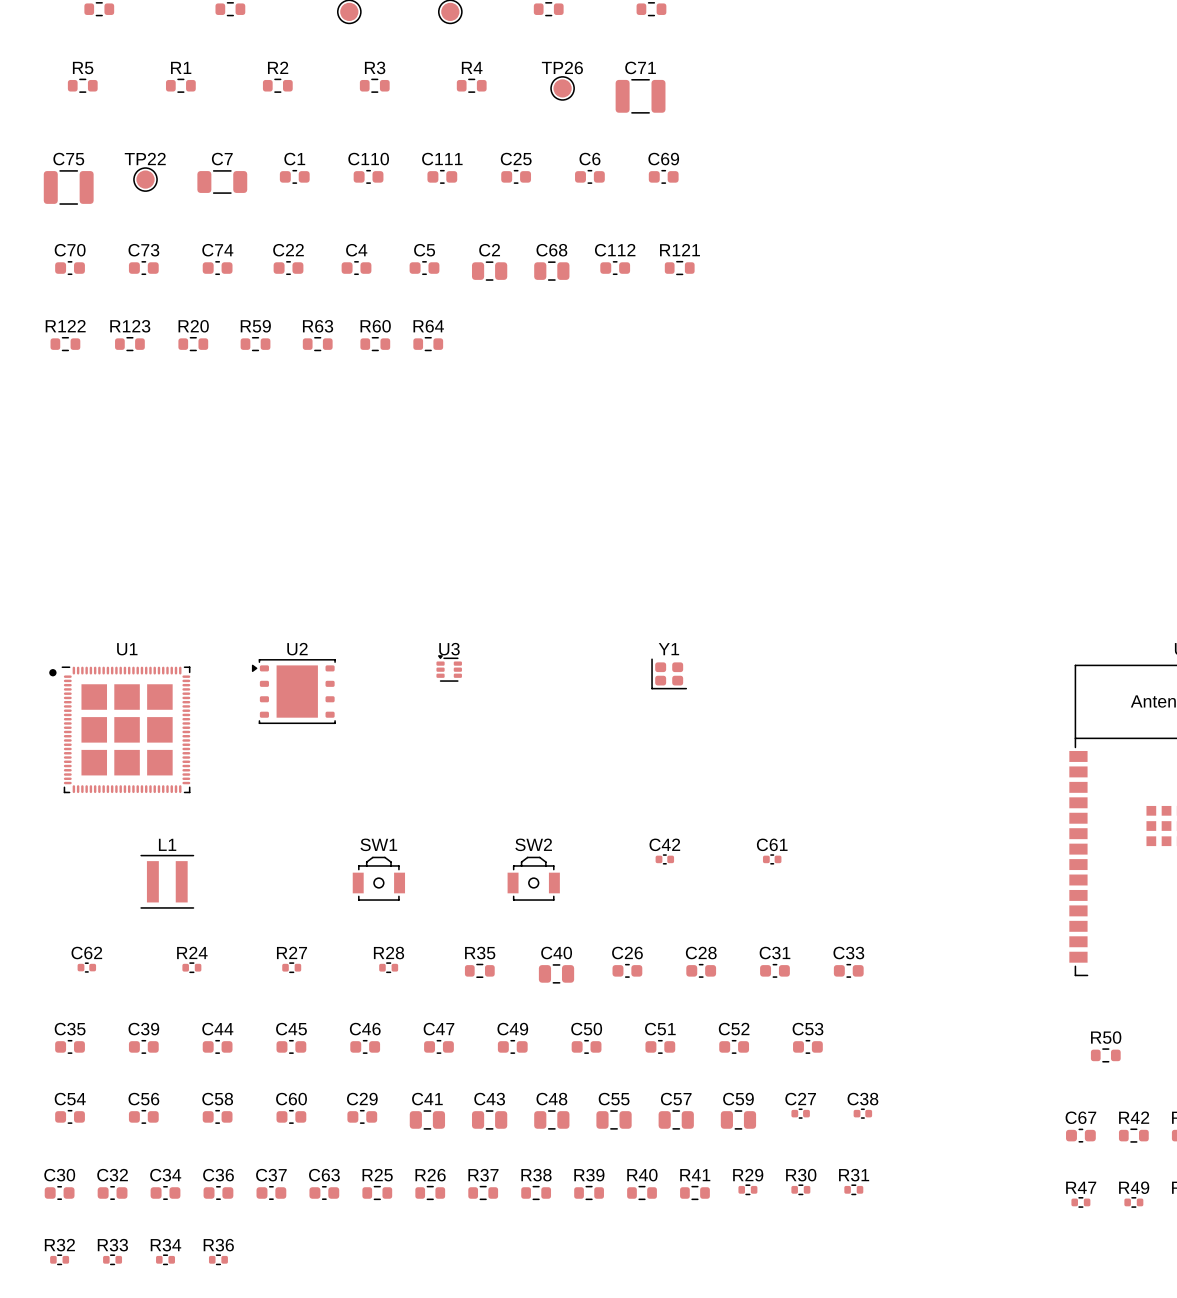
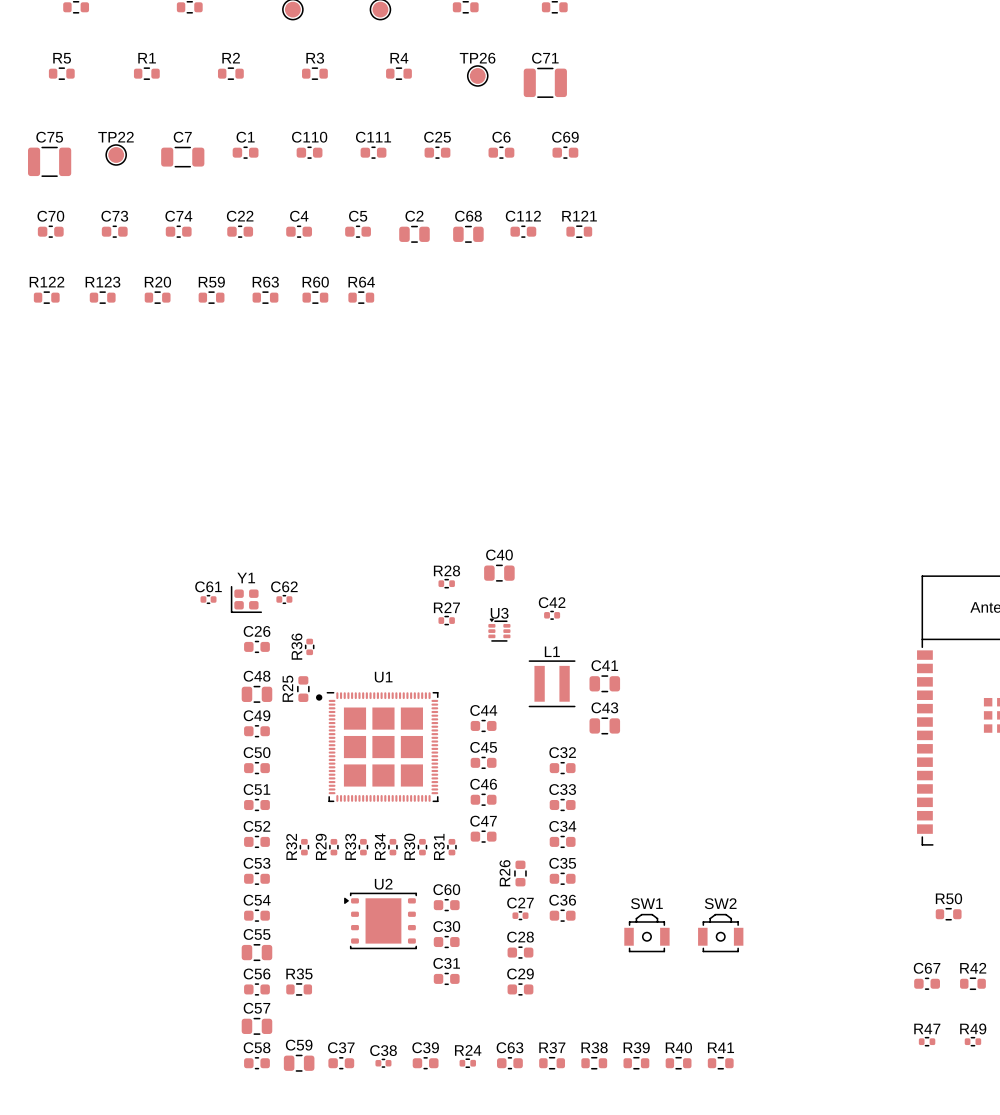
U3 position: (449, 668) -> (499, 630)
Y1 position: (669, 673) -> (246, 599)
U2 position: (293, 691) -> (380, 920)
U1 position: (119, 729) -> (377, 747)
C42 position: (664, 859) -> (552, 615)
C61 position: (772, 859) -> (208, 599)
SW1 position: (378, 878) -> (646, 933)
SW2 position: (533, 878) -> (720, 933)
L1 position: (167, 881) -> (552, 683)
C62 position: (86, 967) -> (284, 599)
R24 position: (191, 967) -> (467, 1063)
R27 position: (291, 967) -> (446, 620)
R28 position: (388, 967) -> (446, 583)
R35 position: (479, 970) -> (299, 989)
C26 position: (627, 970) -> (256, 646)
C28 position: (701, 970) -> (520, 952)
C31 position: (774, 970) -> (446, 978)
C33 position: (848, 970) -> (562, 805)
C40 position: (556, 973) -> (499, 573)
C35 position: (70, 1046) -> (562, 878)
C39 position: (143, 1046) -> (425, 1063)
C44 position: (217, 1046) -> (483, 725)
C45 position: (291, 1046) -> (483, 762)
C46 position: (365, 1046) -> (483, 799)
C47 position: (438, 1046) -> (483, 836)
C49 position: (512, 1046) -> (256, 731)
C50 position: (586, 1046) -> (256, 768)
C51 position: (660, 1046) -> (256, 805)
C52 position: (734, 1046) -> (256, 841)
C53 position: (807, 1046) -> (256, 878)
C27 position: (800, 1113) -> (520, 915)
C38 position: (862, 1113) -> (383, 1063)
C54 position: (70, 1116) -> (256, 915)
C56 position: (143, 1116) -> (256, 989)
C58 position: (217, 1116) -> (256, 1063)
C60 position: (291, 1116) -> (446, 905)
C29 position: (362, 1116) -> (520, 989)
C41 position: (427, 1119) -> (604, 683)
C43 position: (489, 1119) -> (604, 725)
C48 position: (551, 1119) -> (256, 694)
C55 position: (614, 1119) -> (256, 952)
C57 position: (676, 1119) -> (256, 1026)
C59 position: (738, 1119) -> (299, 1063)
R25 name position: R25 (377, 1175) -> R25 (287, 688)
R26 name position: R26 (430, 1175) -> R26 (505, 873)
R29 rotation: 0° (747, 1189) -> 90° clockwise (333, 847)
R29 position: (747, 1189) -> (333, 847)
R30 rotation: 0° (800, 1189) -> 90° clockwise (422, 847)
R30 position: (800, 1189) -> (422, 847)
R31 rotation: 0° (853, 1189) -> 90° clockwise (451, 847)
R31 position: (853, 1189) -> (451, 847)
C30 position: (59, 1192) -> (446, 942)
C32 position: (112, 1192) -> (562, 768)
C34 position: (165, 1192) -> (562, 841)
C36 position: (218, 1192) -> (562, 915)
C37 position: (271, 1192) -> (341, 1063)
C63 position: (324, 1192) -> (509, 1063)
R25 rotation: 0° (377, 1192) -> 90° clockwise (303, 689)
R25 position: (377, 1192) -> (303, 689)
R26 rotation: 0° (430, 1192) -> 90° clockwise (520, 873)
R26 position: (430, 1192) -> (520, 873)
R37 position: (483, 1192) -> (552, 1063)
R38 position: (536, 1192) -> (594, 1063)
R39 position: (589, 1192) -> (636, 1063)
R40 position: (642, 1192) -> (678, 1063)
R41 position: (694, 1192) -> (720, 1063)
R32 rotation: 0° (59, 1259) -> 90° clockwise (304, 847)
R32 position: (59, 1259) -> (304, 847)
R33 rotation: 0° (112, 1259) -> 90° clockwise (363, 847)
R33 position: (112, 1259) -> (363, 847)
R34 rotation: 0° (165, 1259) -> 90° clockwise (392, 847)
R34 position: (165, 1259) -> (392, 847)
R36 rotation: 0° (218, 1259) -> 90° clockwise (309, 646)
R36 position: (218, 1259) -> (309, 646)

